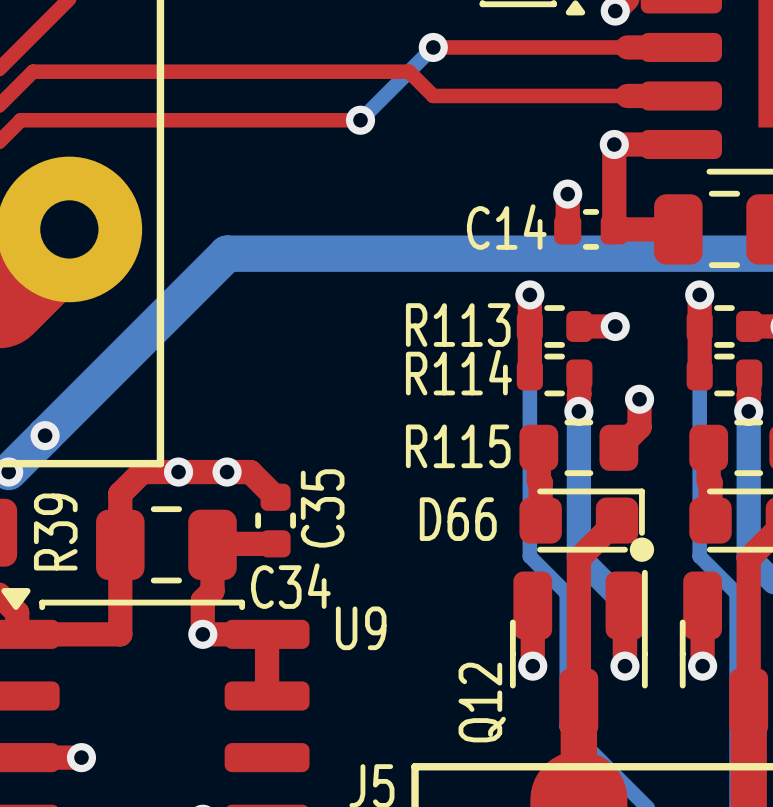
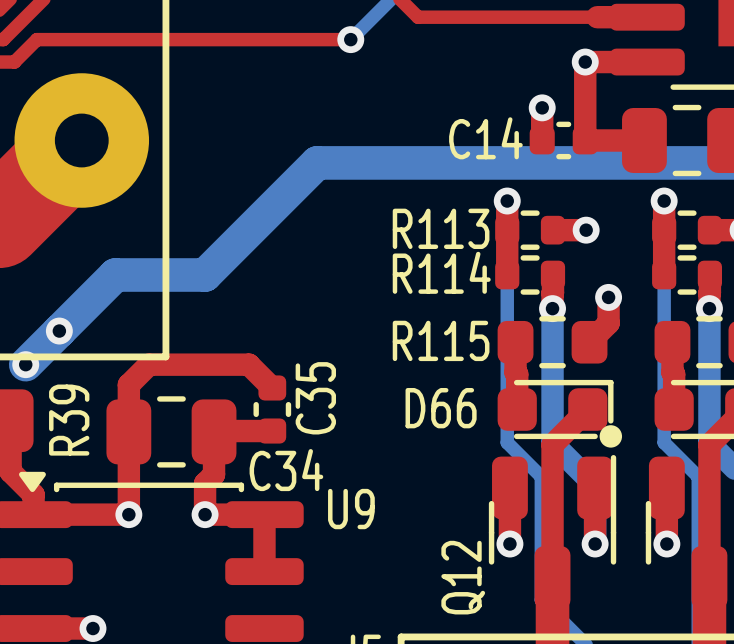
bottom track: (324, 253) (227, 253) (105, 374) -> (317, 162) (205, 275) (115, 275)
via: (178, 472) -> none
via: (227, 472) -> none
via: none -> (128, 514)

